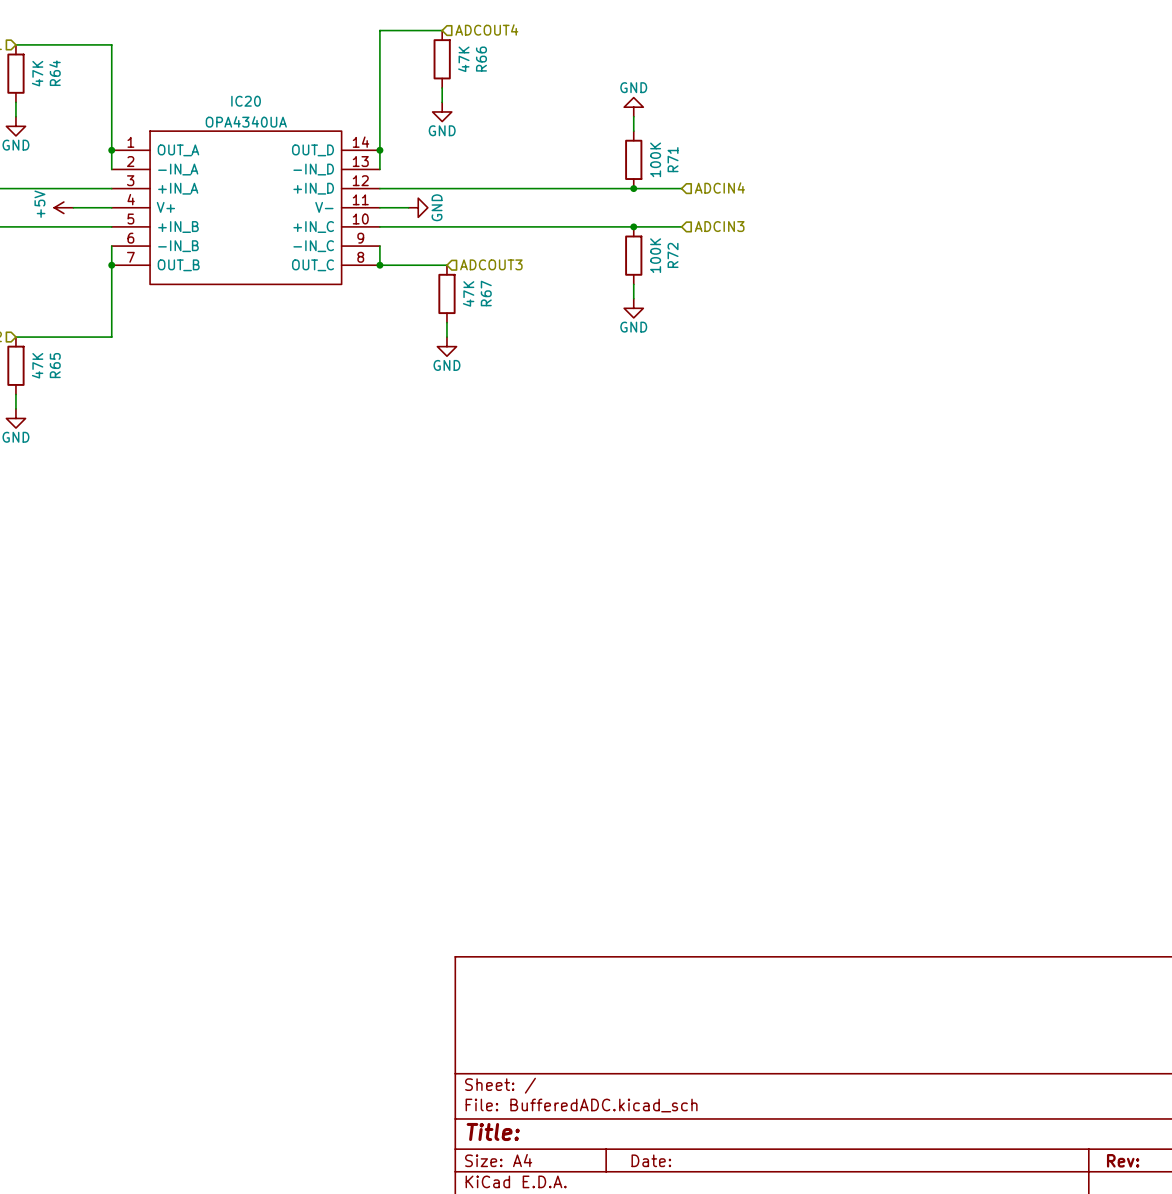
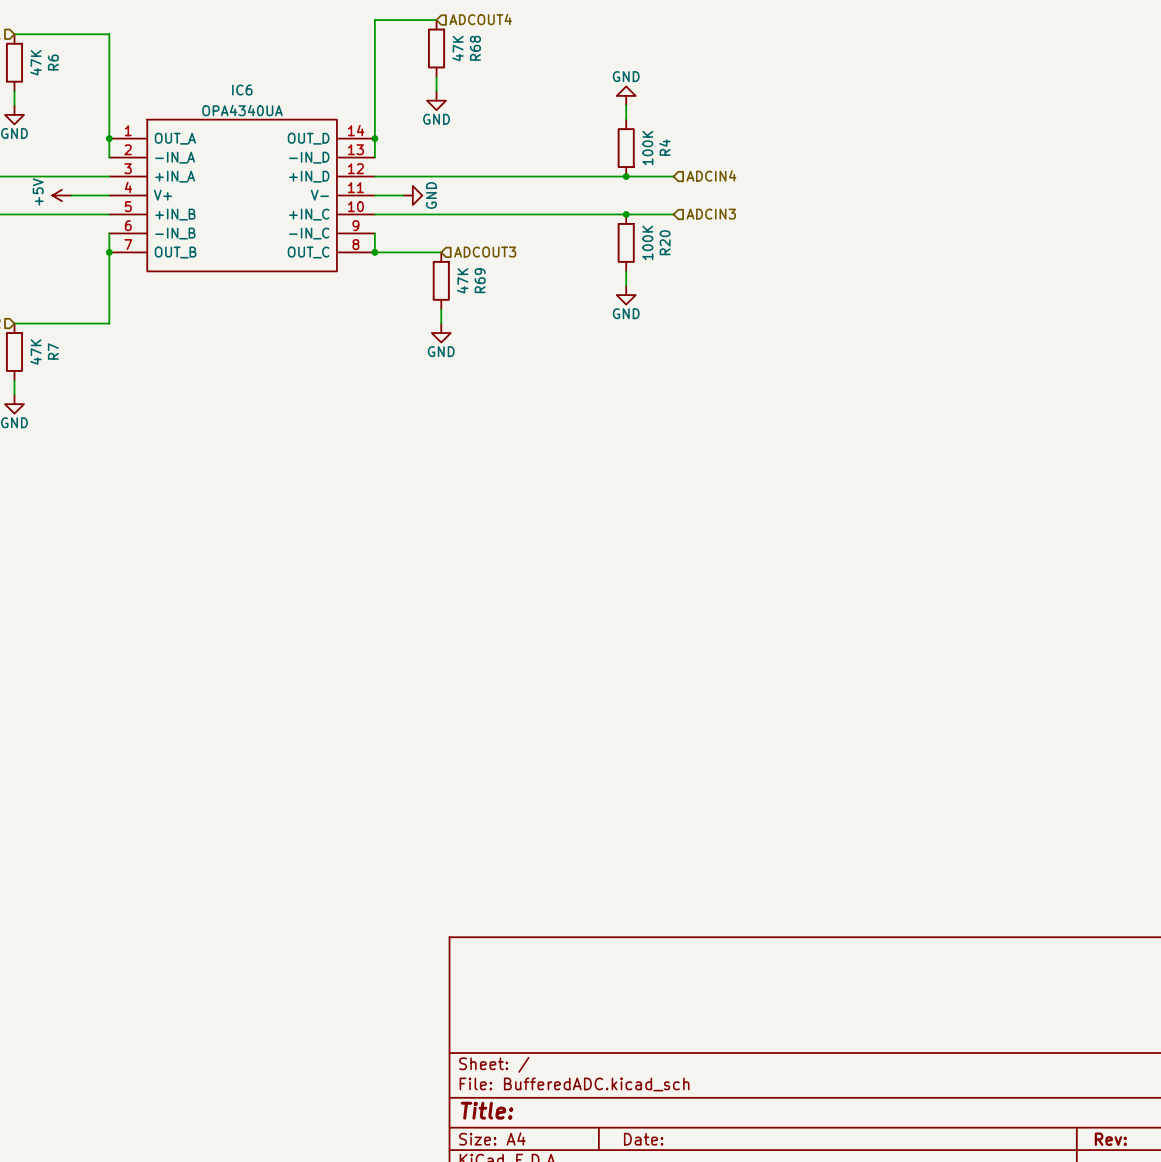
R66 name: R66 (481, 59) -> R68 (475, 48)
R64 name: R64 (55, 73) -> R6 (53, 62)
IC20 name: IC20 (246, 101) -> IC6 (242, 90)
R71 name: R71 (673, 159) -> R4 (664, 147)
R72 name: R72 (673, 255) -> R20 (665, 242)
R67 name: R67 (486, 293) -> R69 (480, 280)
R65 name: R65 (55, 365) -> R7 (53, 351)

